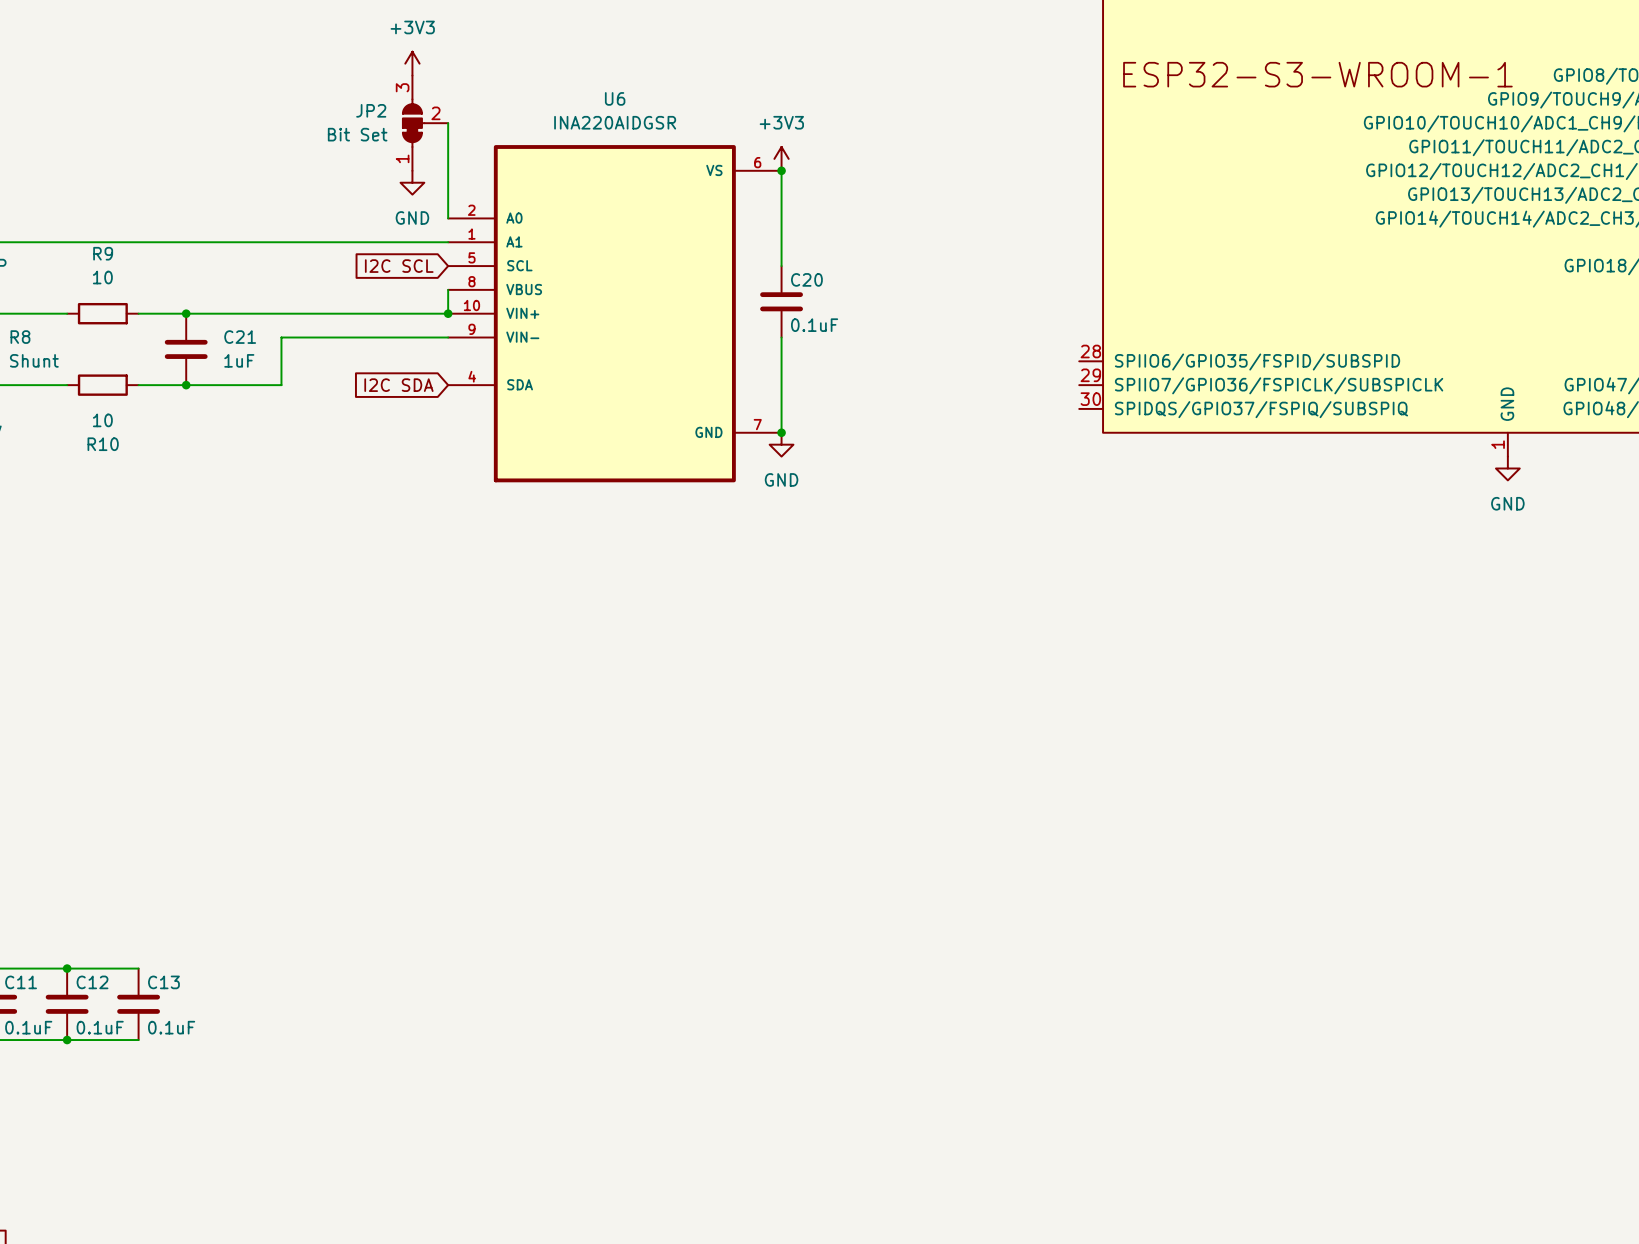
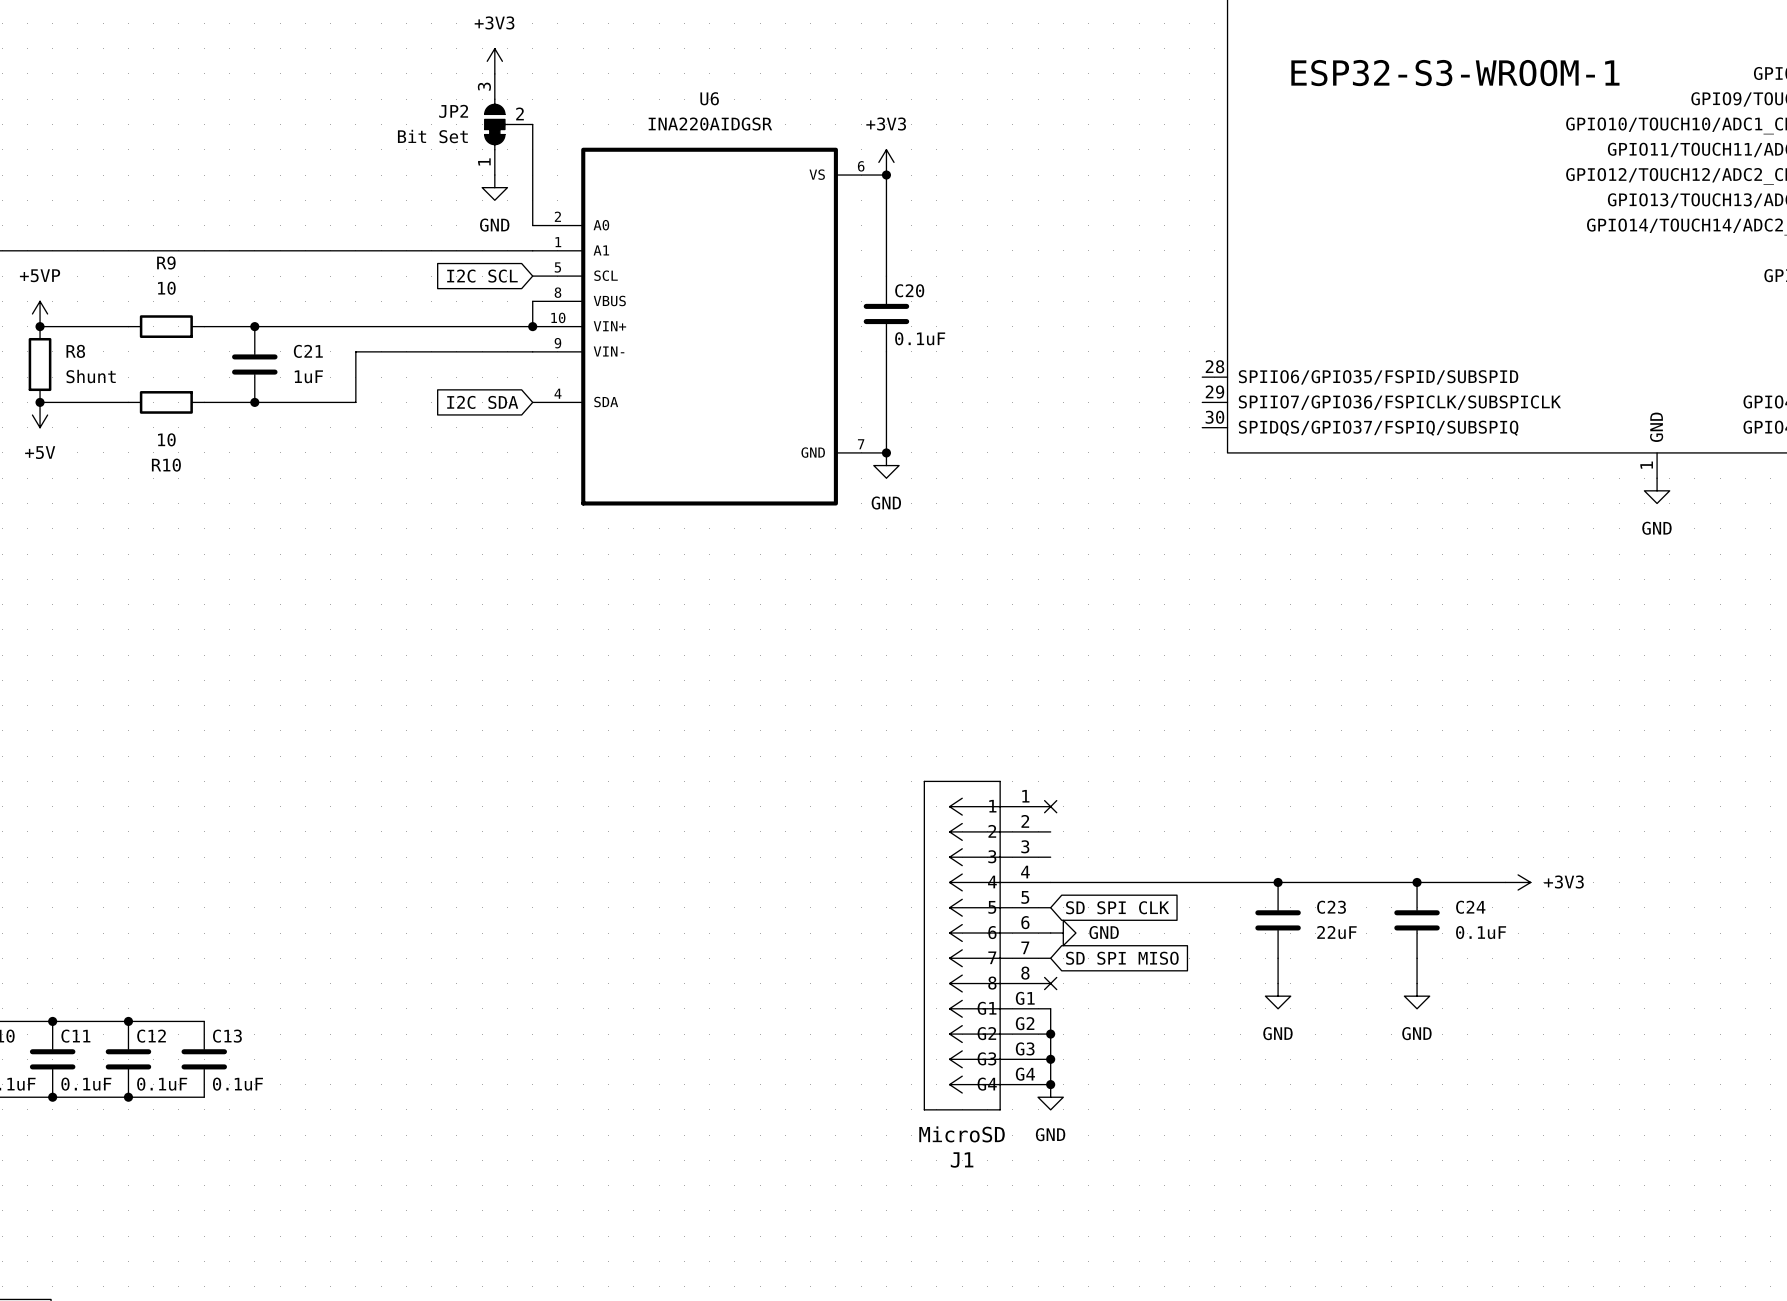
no-connect mark: none -> (1050, 806)
wire: none -> (1050, 882) (1505, 882)
junction: none -> (1278, 882)
junction: none -> (1417, 882)
power symbol: none -> +3V3 (1518, 882)
global label: none -> SD SPI CLK (1117, 907)
C23: none -> 22uF (1278, 920)
C24: none -> 0.1uF (1417, 920)
power symbol: none -> GND (1063, 933)
J1: none -> MicroSD (987, 945)
global label: none -> SD SPI MISO (1122, 958)
wire: none -> (1278, 958) (1278, 983)
wire: none -> (1417, 958) (1417, 983)
no-connect mark: none -> (1050, 983)
power symbol: none -> GND (1278, 996)
power symbol: none -> GND (1417, 996)
wire: none -> (1050, 1008) (1050, 1084)
junction: none -> (1050, 1034)
junction: none -> (1050, 1059)
junction: none -> (1050, 1084)
power symbol: none -> GND (1050, 1097)

